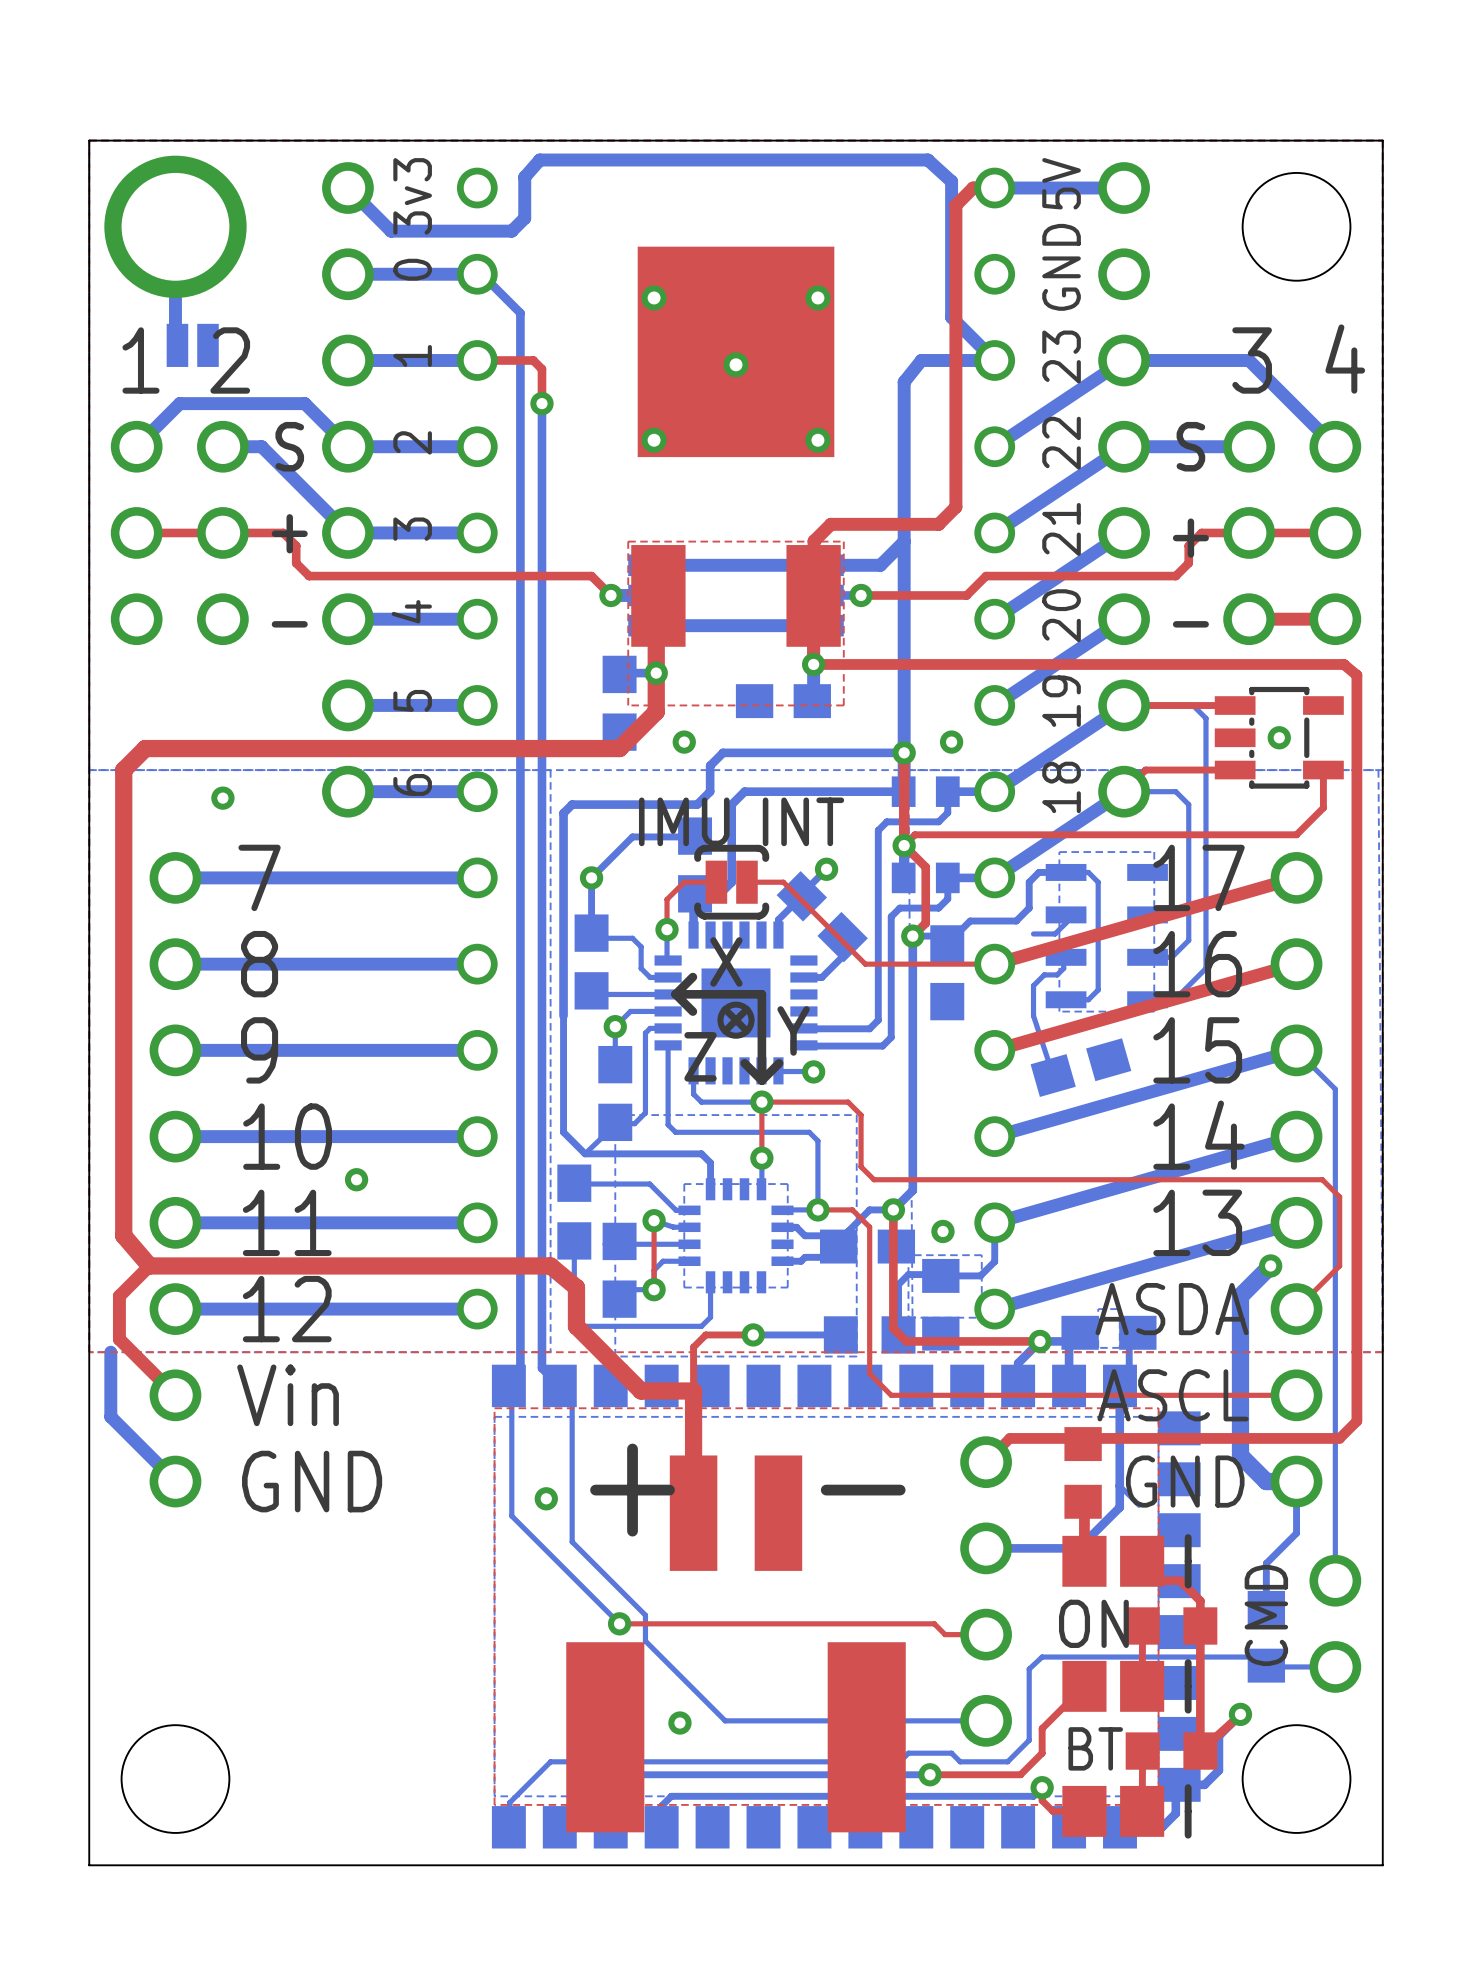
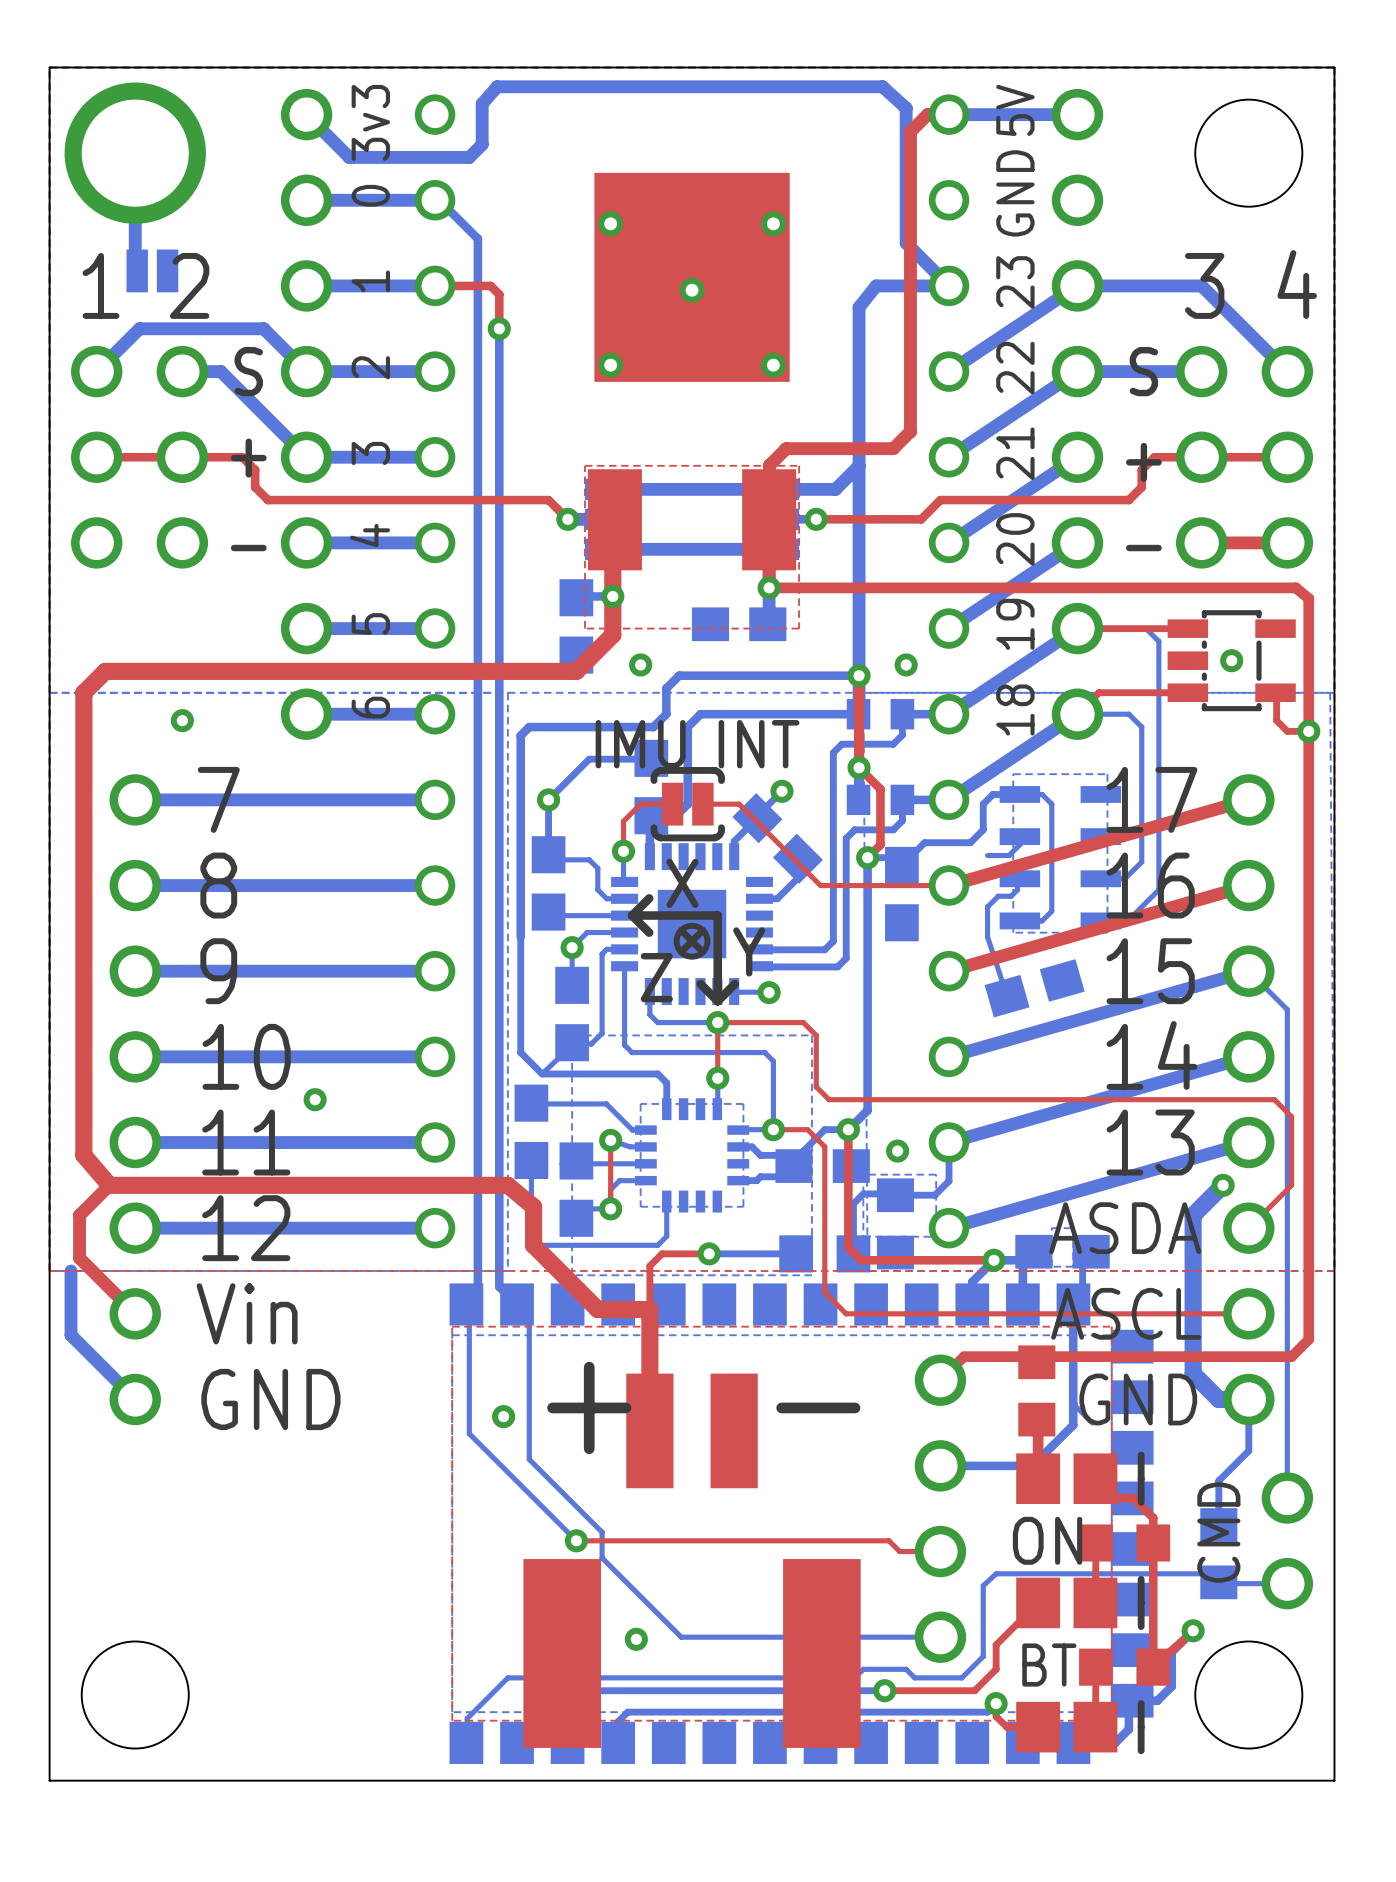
top track: (1323, 770) (1323, 807) (1296, 834) (914, 834) (904, 845) -> (1275, 692) (1276, 720) (1287, 731) (1308, 731)
via: none -> (1308, 731)

